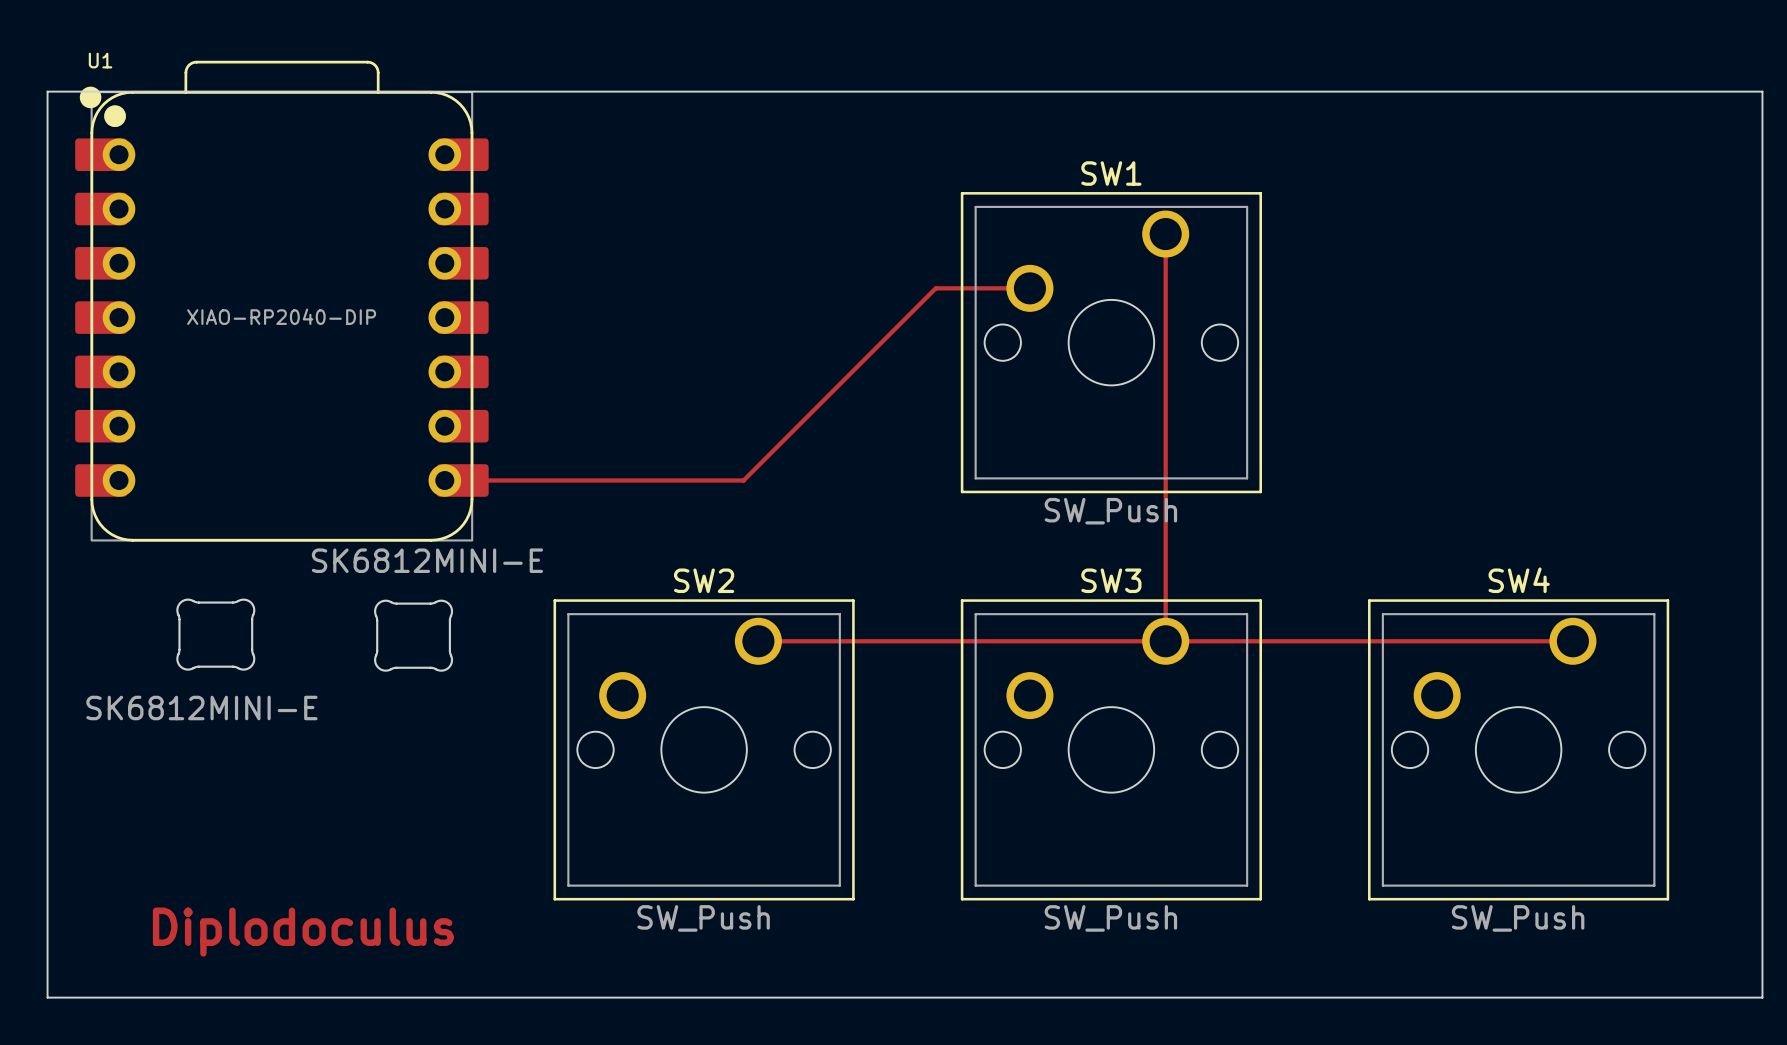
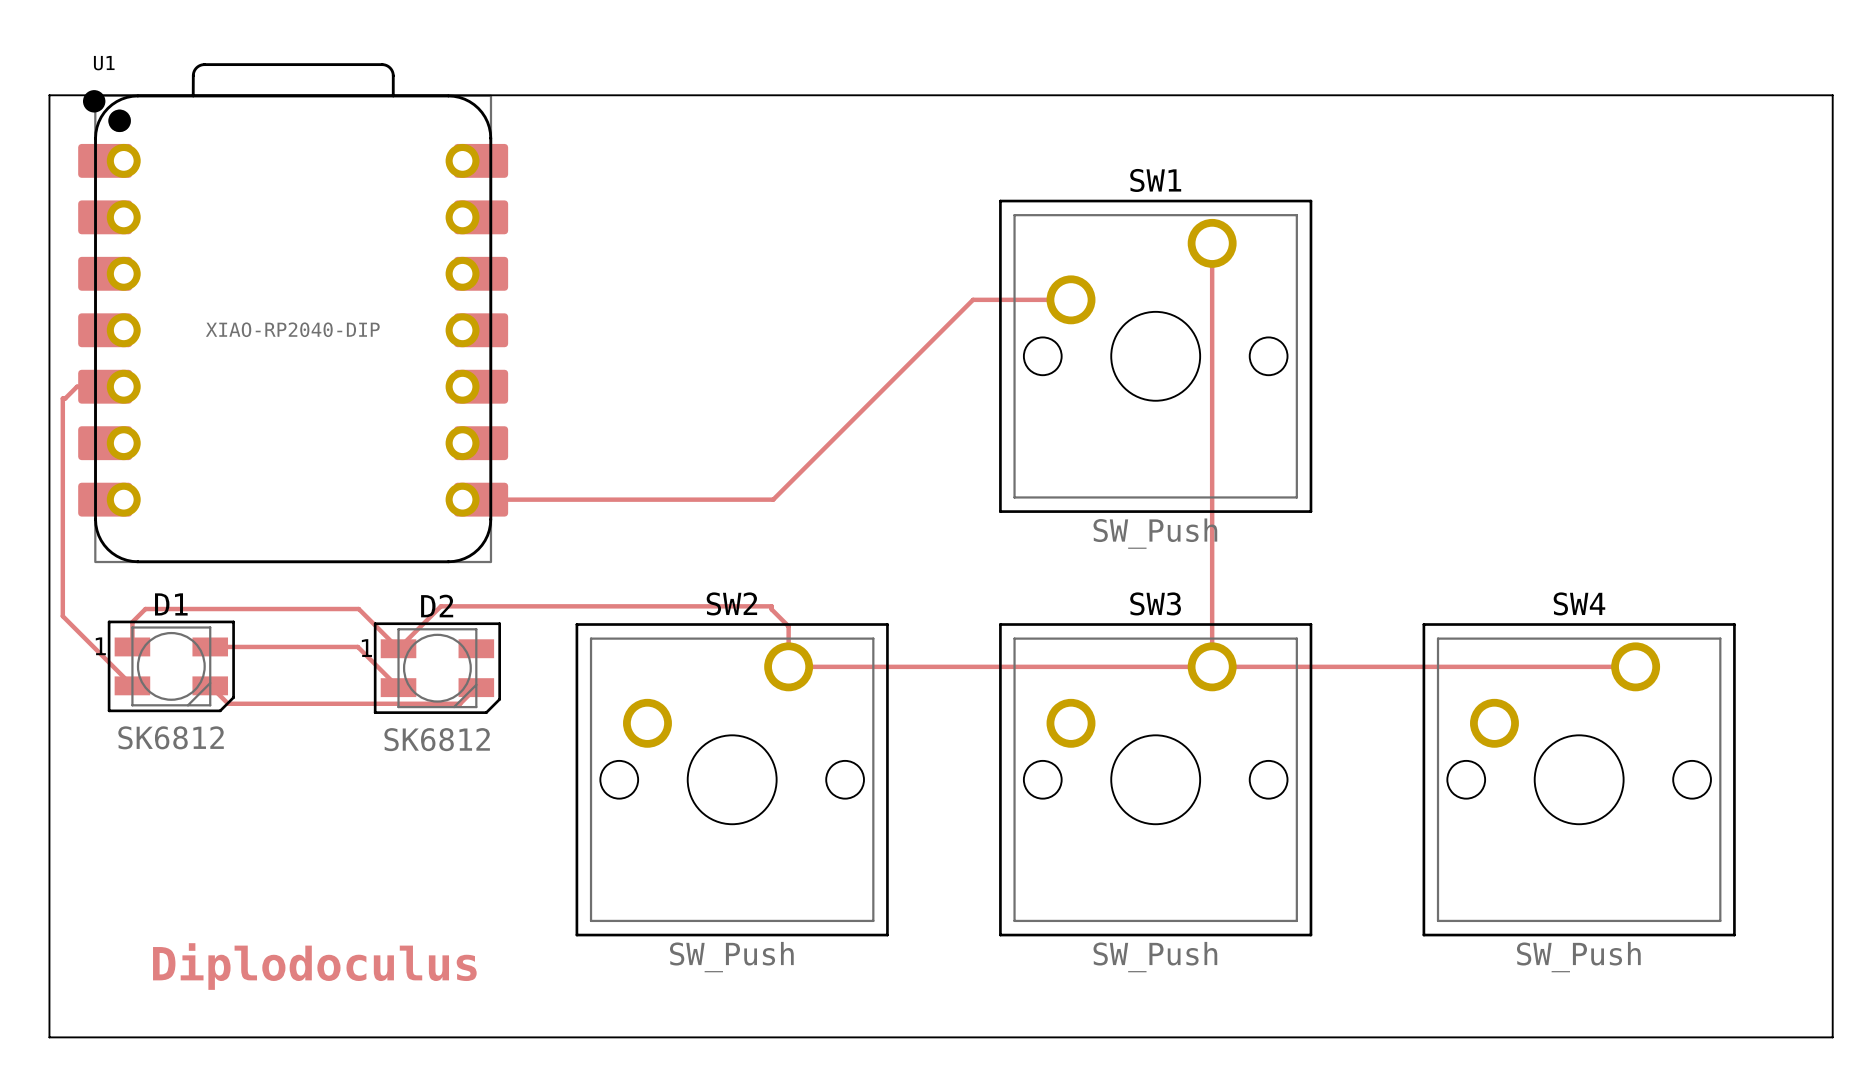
track: none -> (105, 386) (77, 386) (65, 398) (62, 398) (62, 616) (132, 685)
track: none -> (132, 646) (132, 622) (145, 609) (358, 609) (398, 648) (440, 606) (771, 606) (771, 609) (788, 626) (788, 666)
track: none -> (210, 646) (357, 646) (398, 687)
part: SK6812MINI-E (215, 634) -> none
part: SK6812MINI-E (413, 635) -> none
D1: none -> SK6812 (171, 666)
D2: none -> SK6812 (437, 668)
track: none -> (210, 685) (228, 703) (460, 703) (476, 687)

